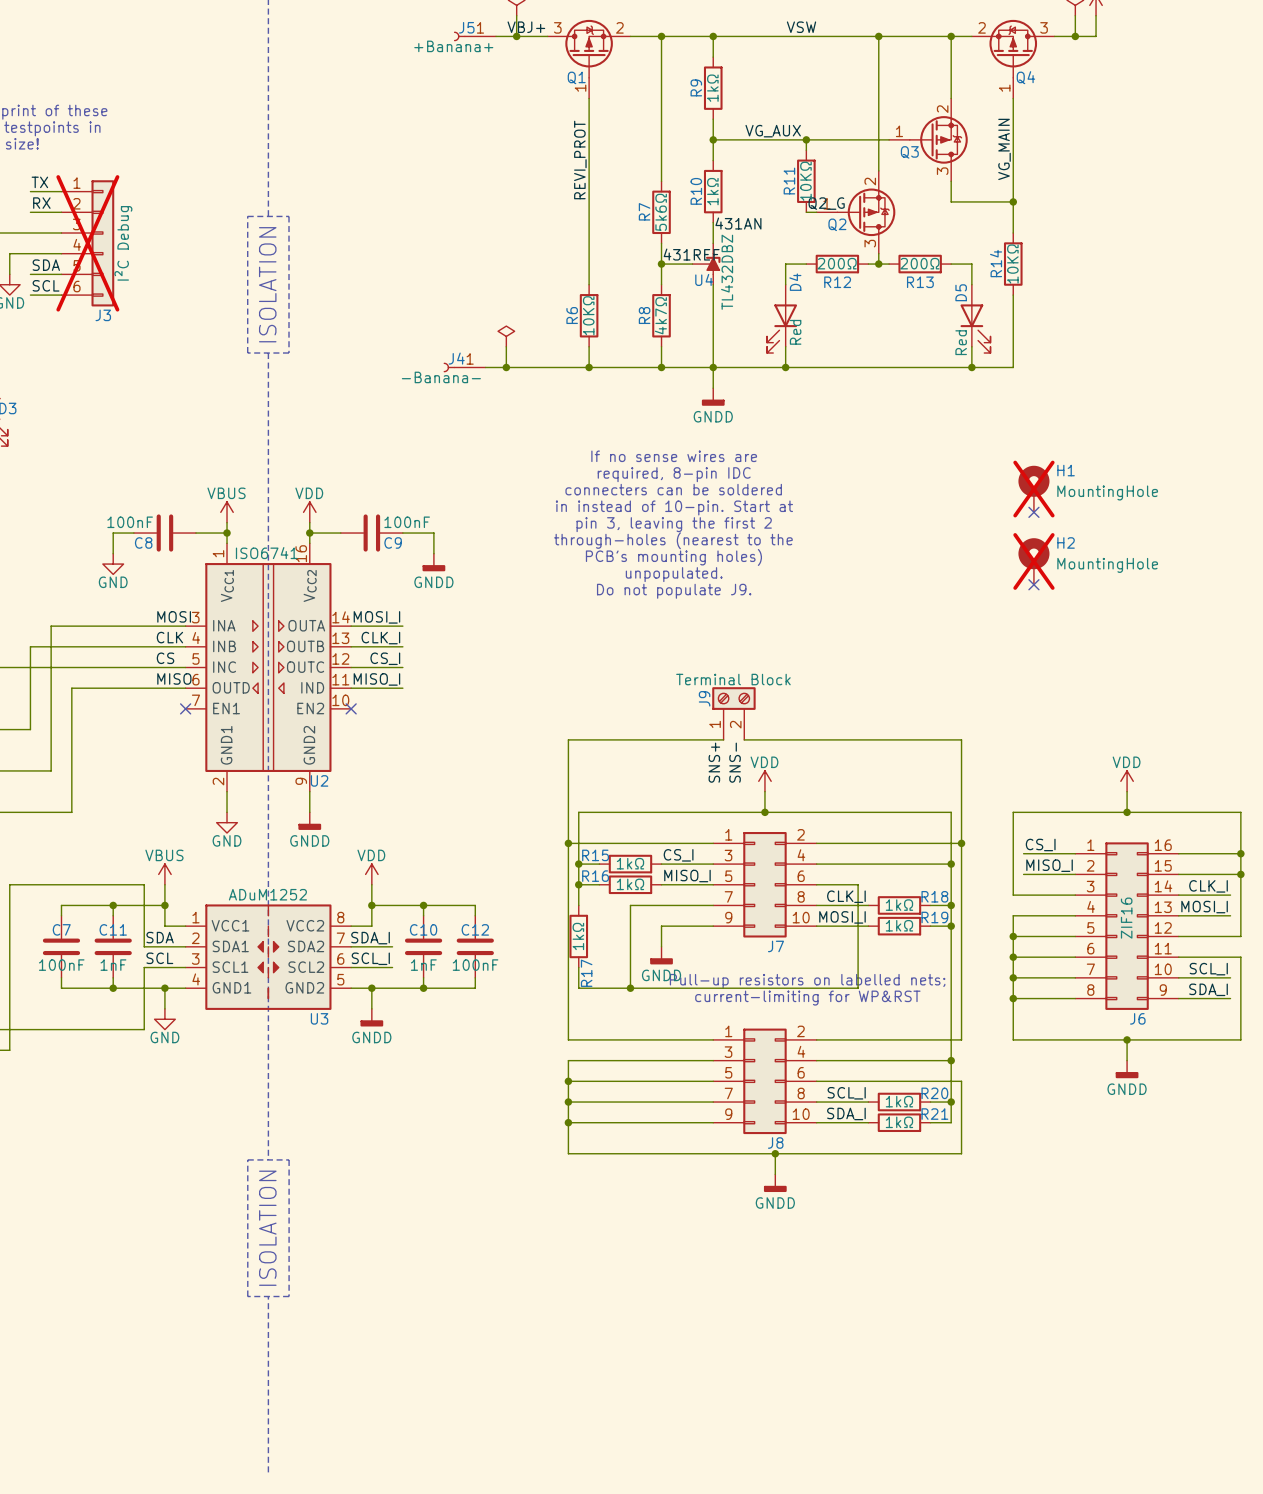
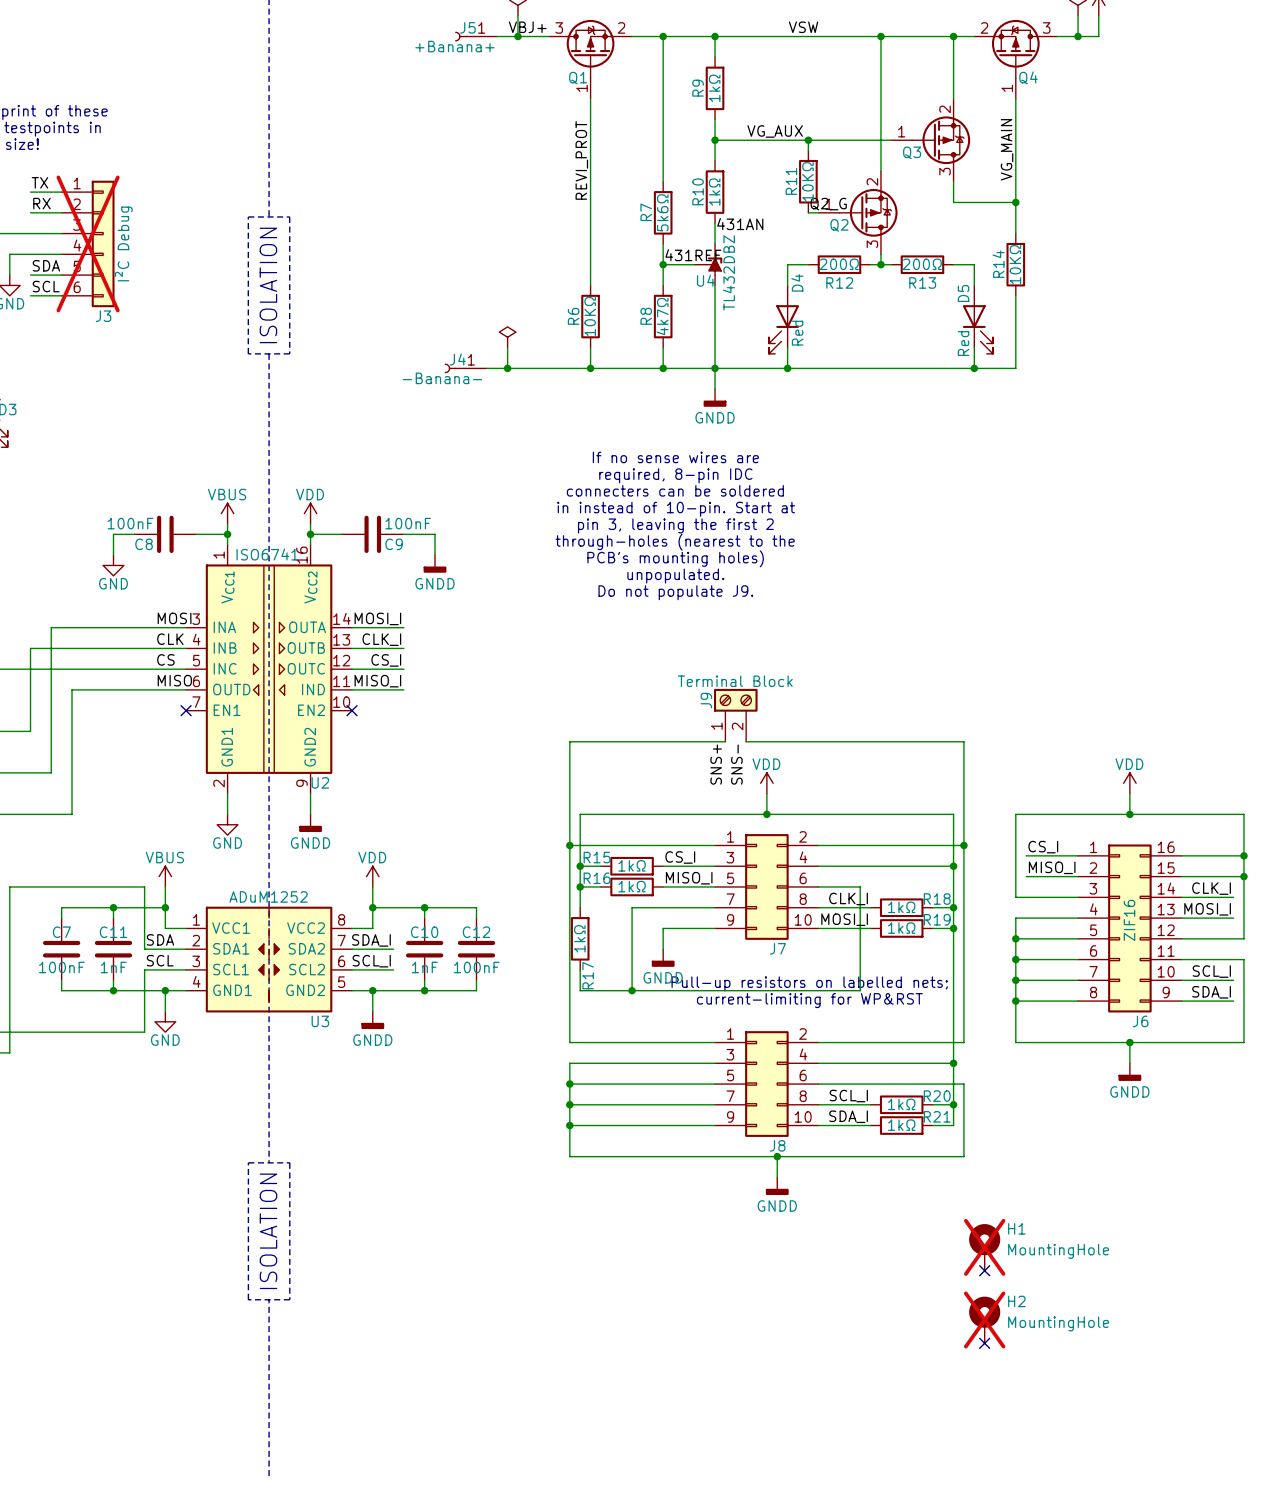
H1 position: (1033, 489) -> (984, 1247)
no-connect mark: (1033, 512) -> none
H2 position: (1033, 561) -> (984, 1319)
no-connect mark: (1033, 584) -> none
no-connect mark: none -> (984, 1270)
no-connect mark: none -> (984, 1343)

